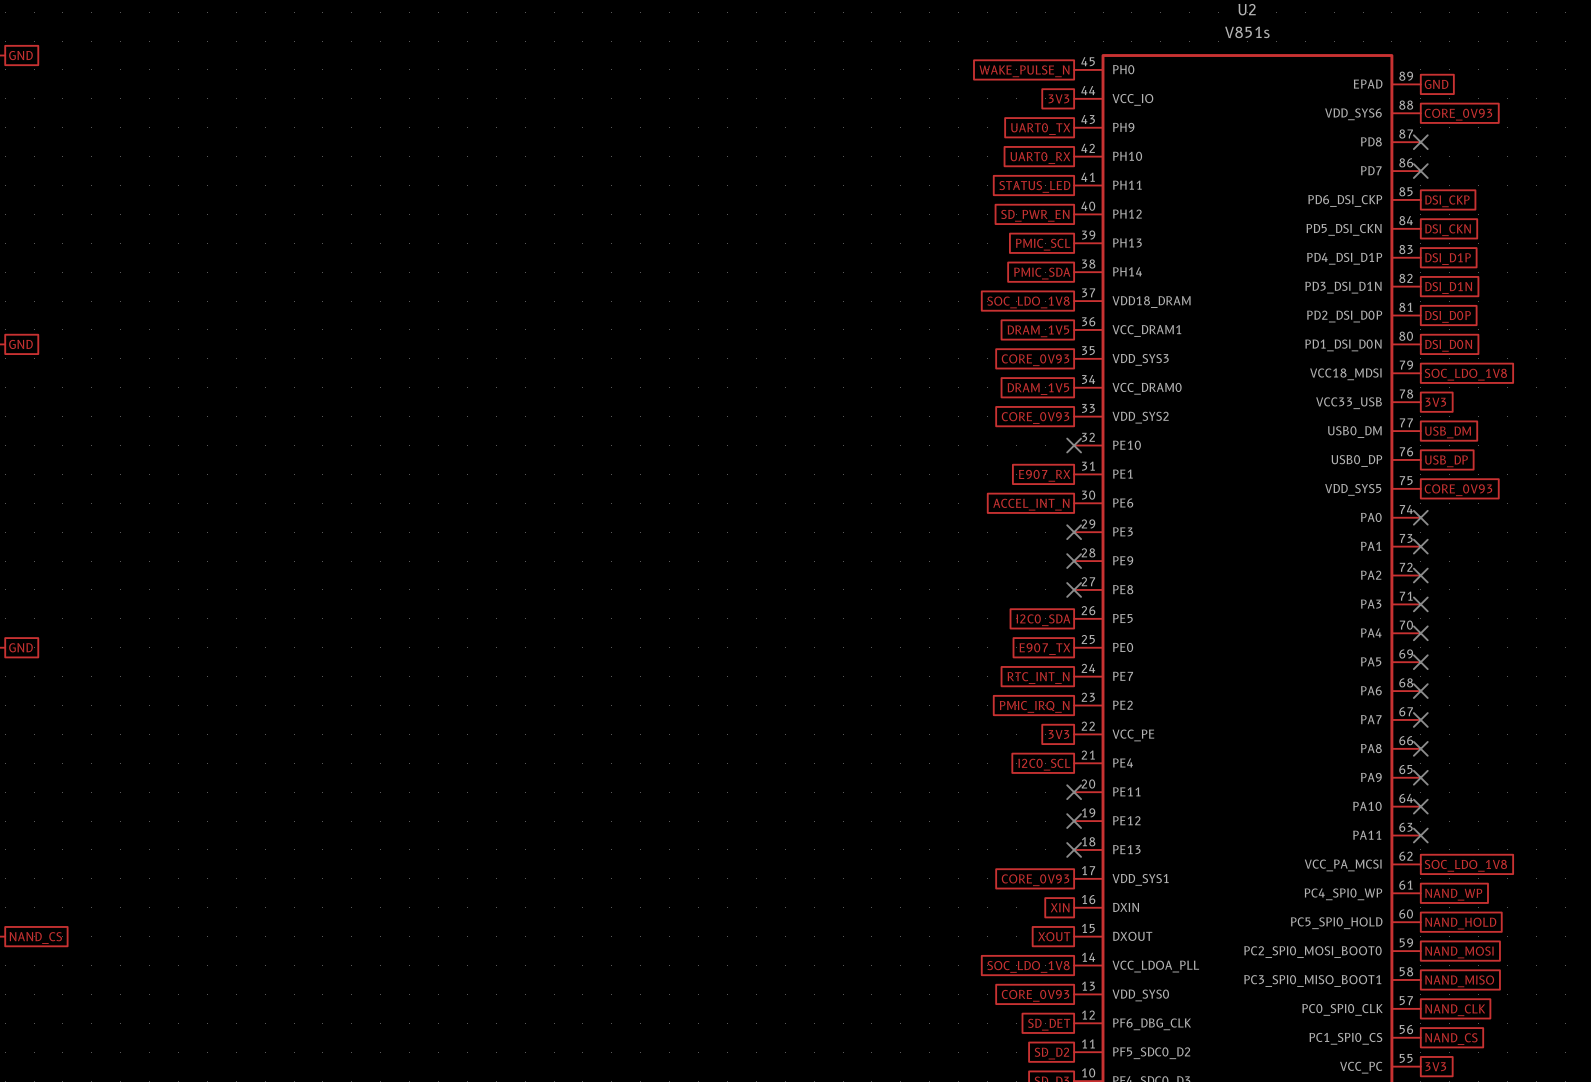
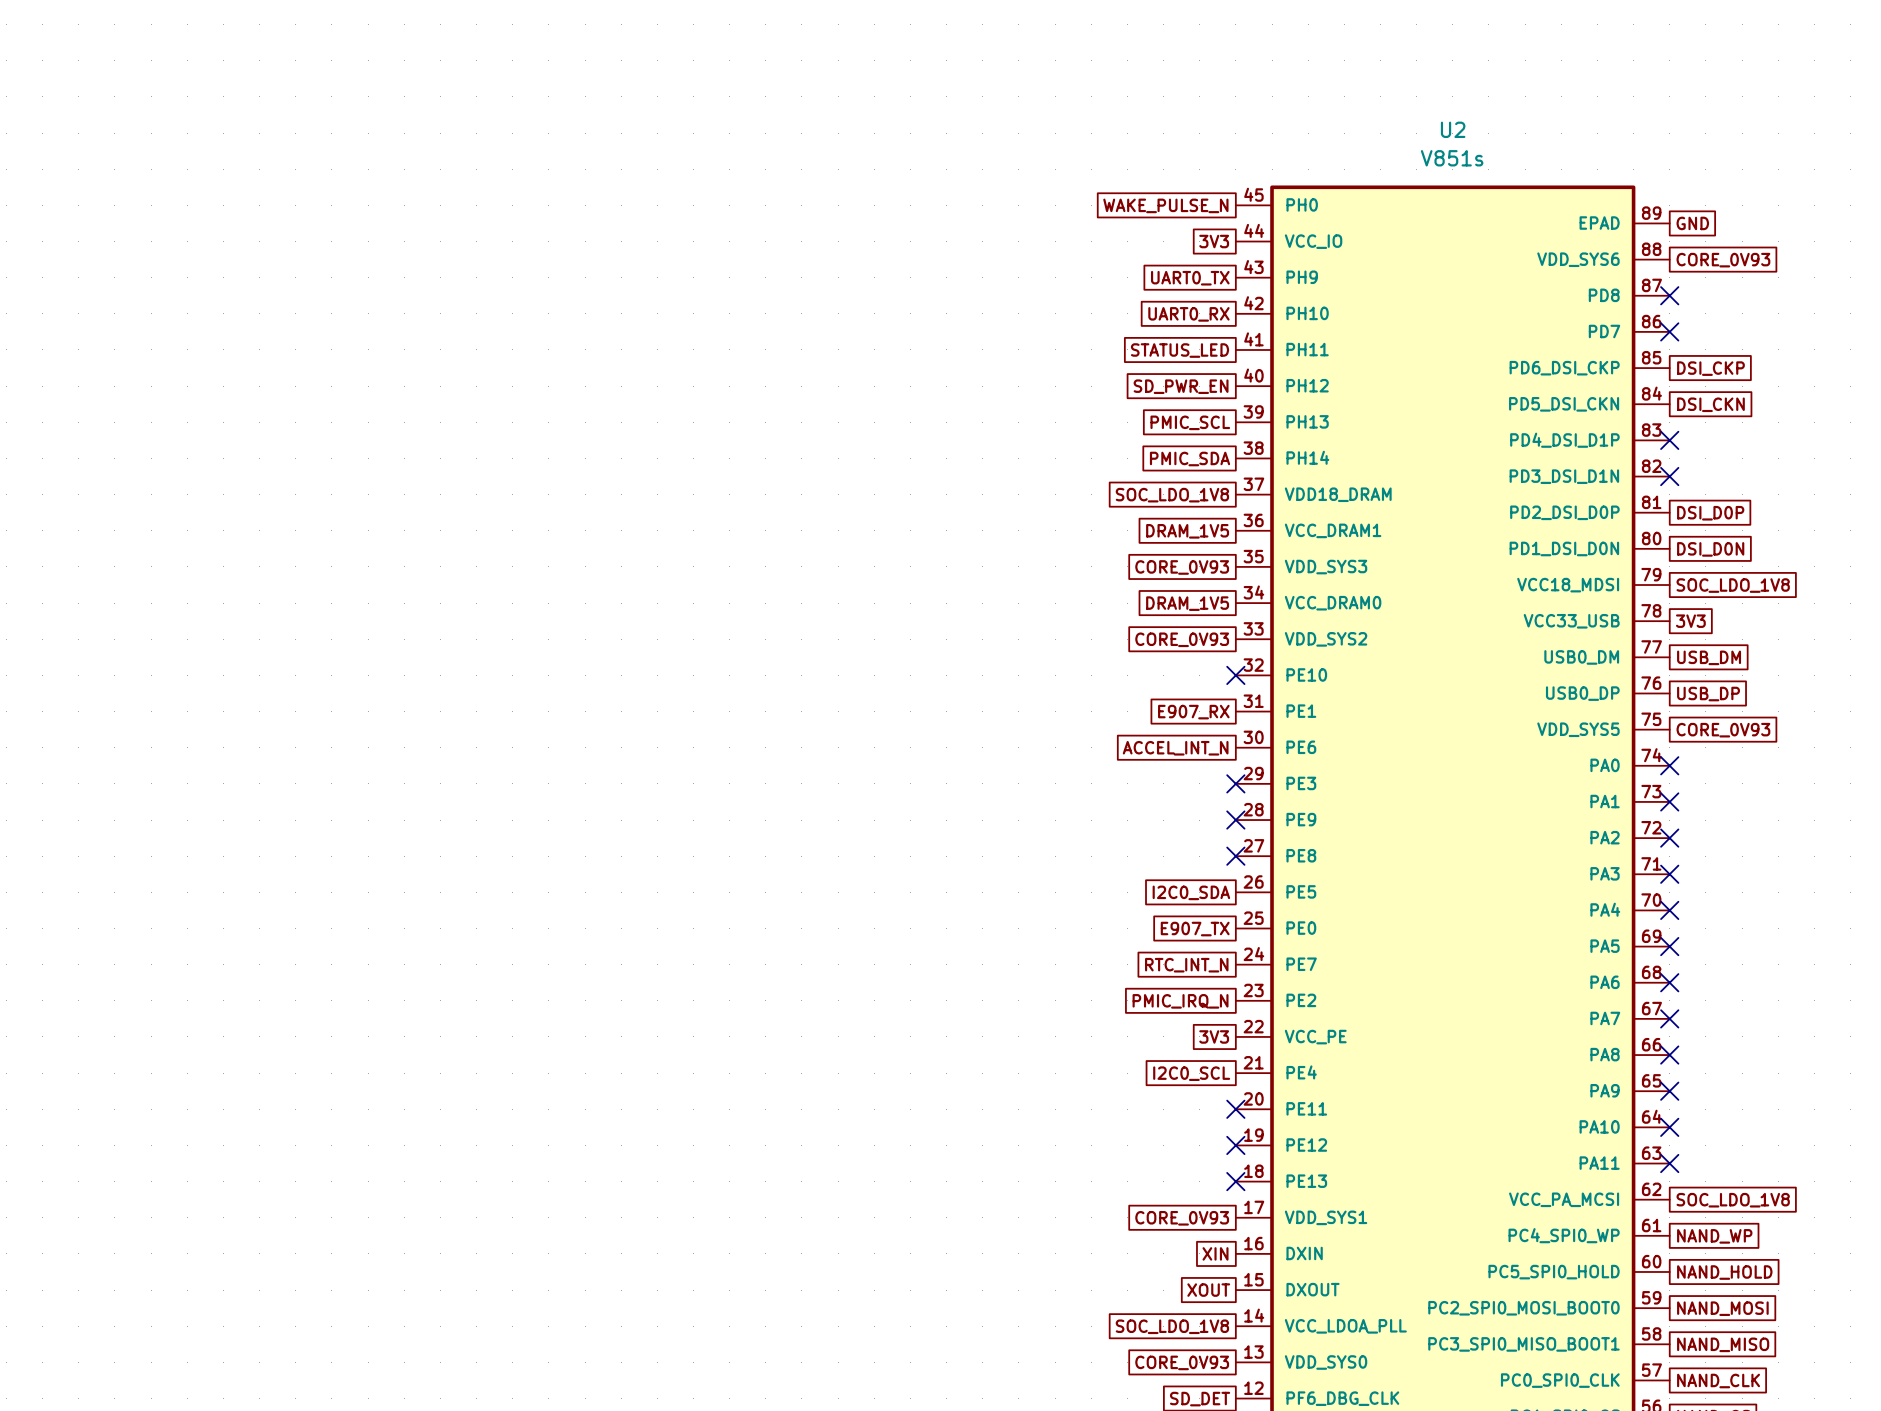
no-connect mark: none -> (1669, 440)
global label: DSI_D1P (1448, 259) -> none
no-connect mark: none -> (1669, 476)
global label: DSI_D1N (1448, 287) -> none

